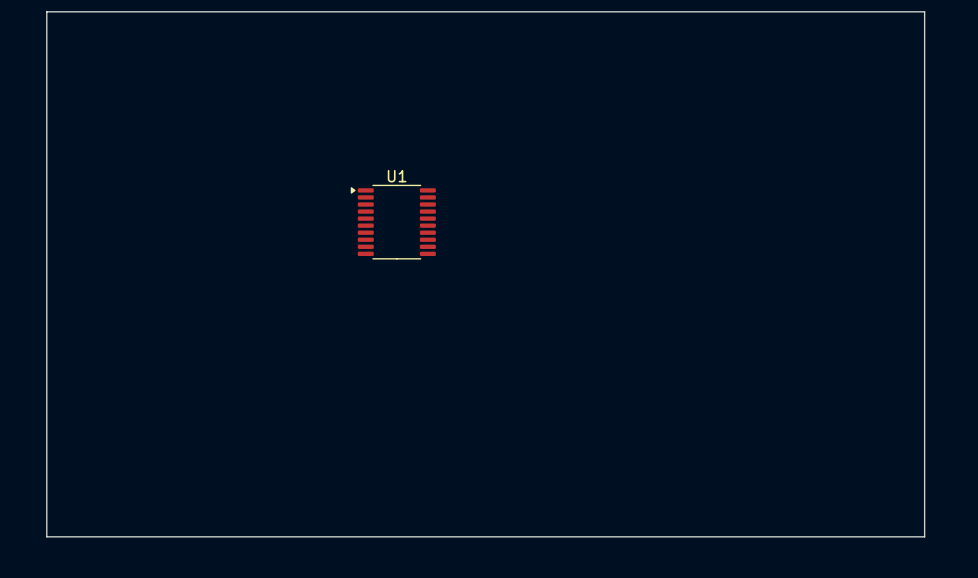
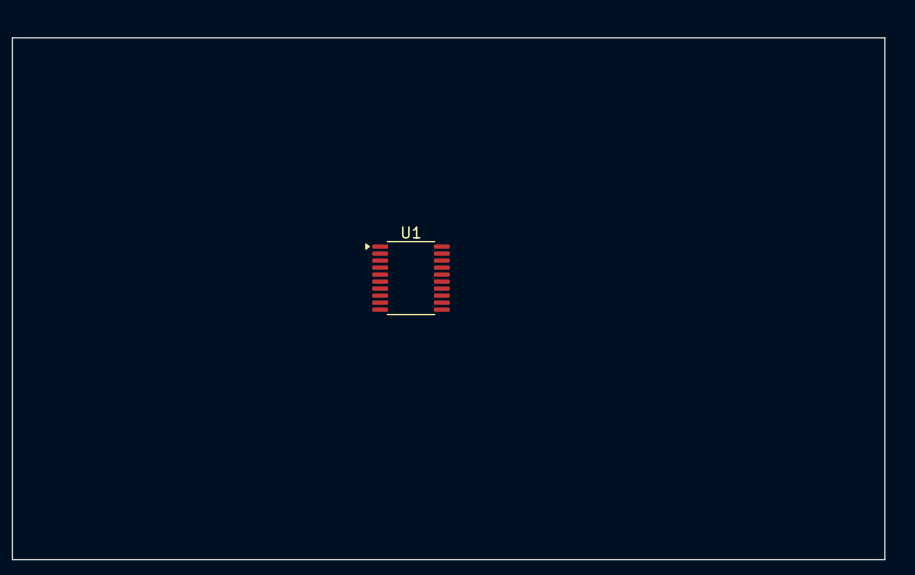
U1 position: (393, 222) -> (407, 278)

